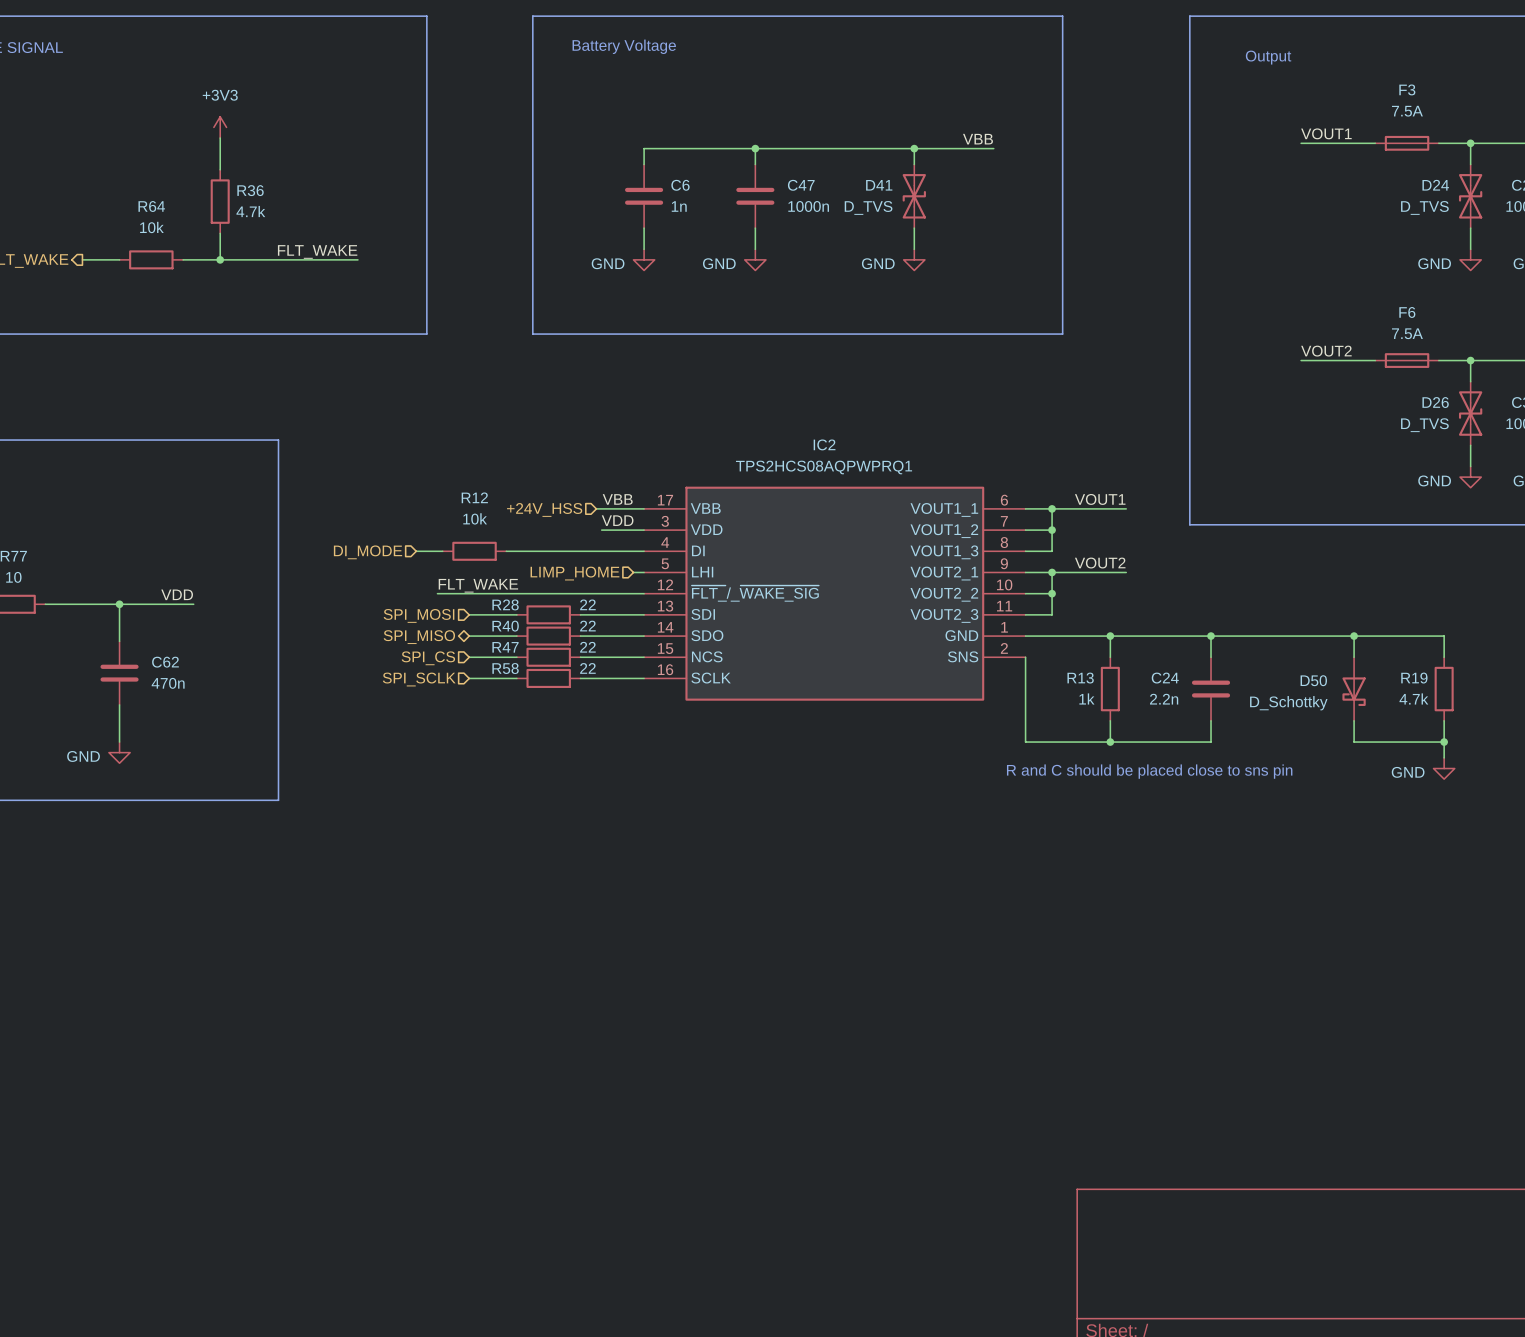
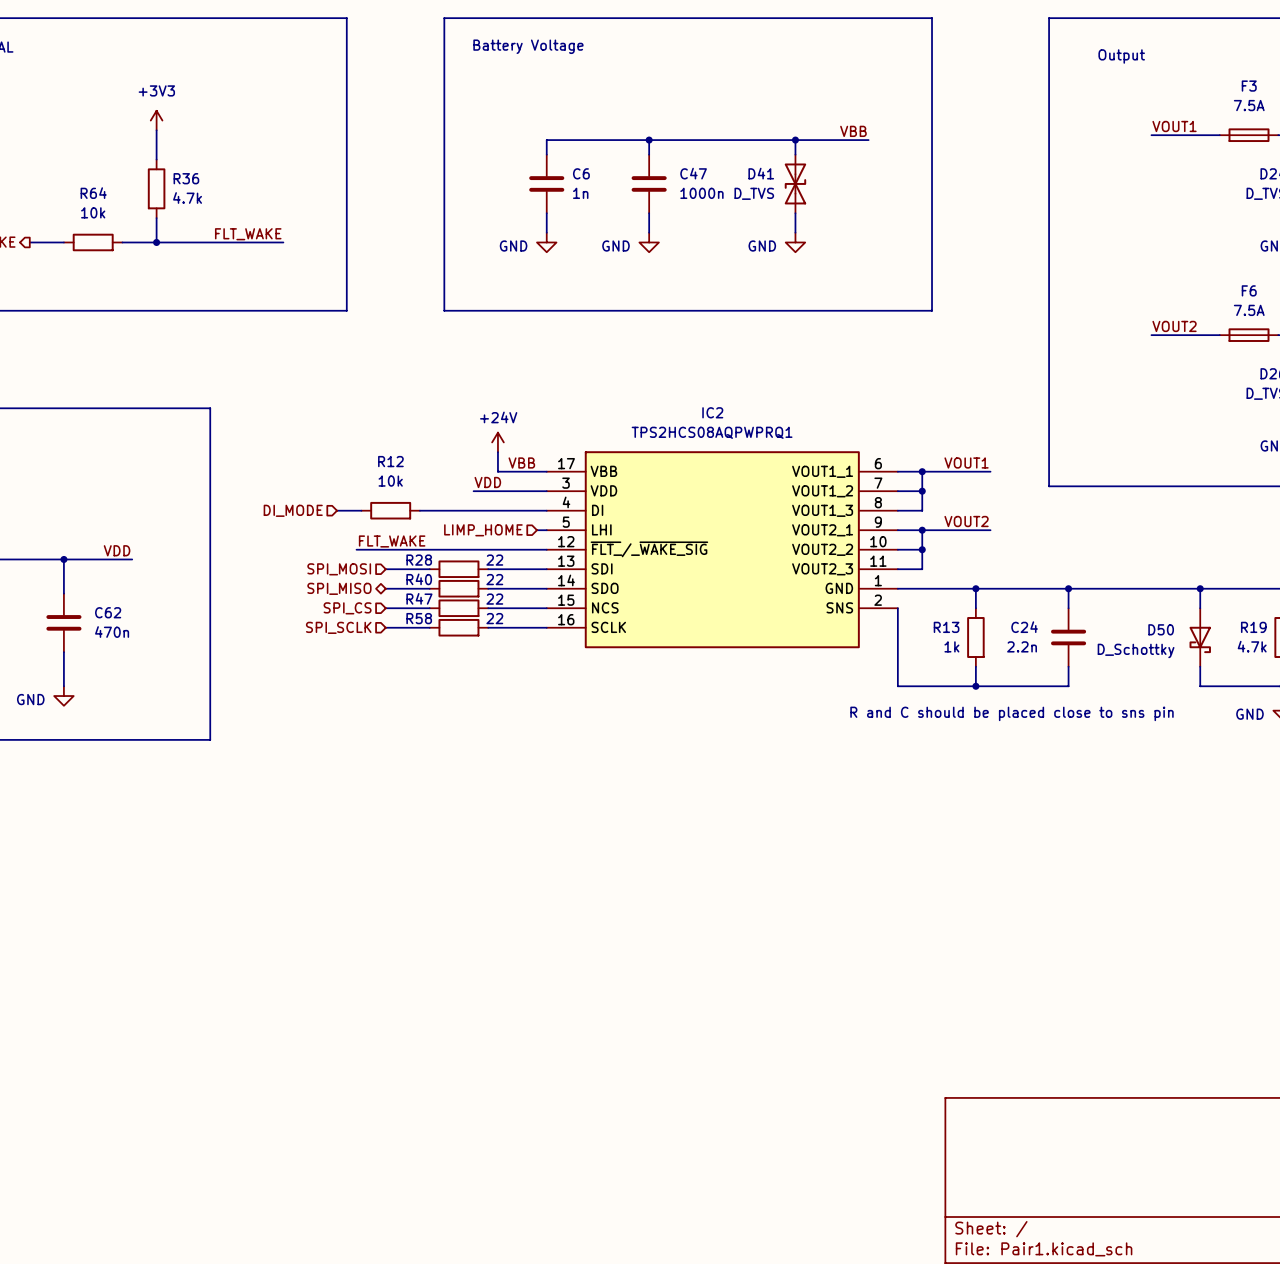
power symbol: none -> +24V (497, 442)
wire: none -> (497, 452) (497, 471) (502, 471)
hierarchical label: +24V_HSS (544, 509) -> none
label position: VDD (617, 520) -> VDD (487, 482)
wire: none -> (473, 491) (507, 491)

